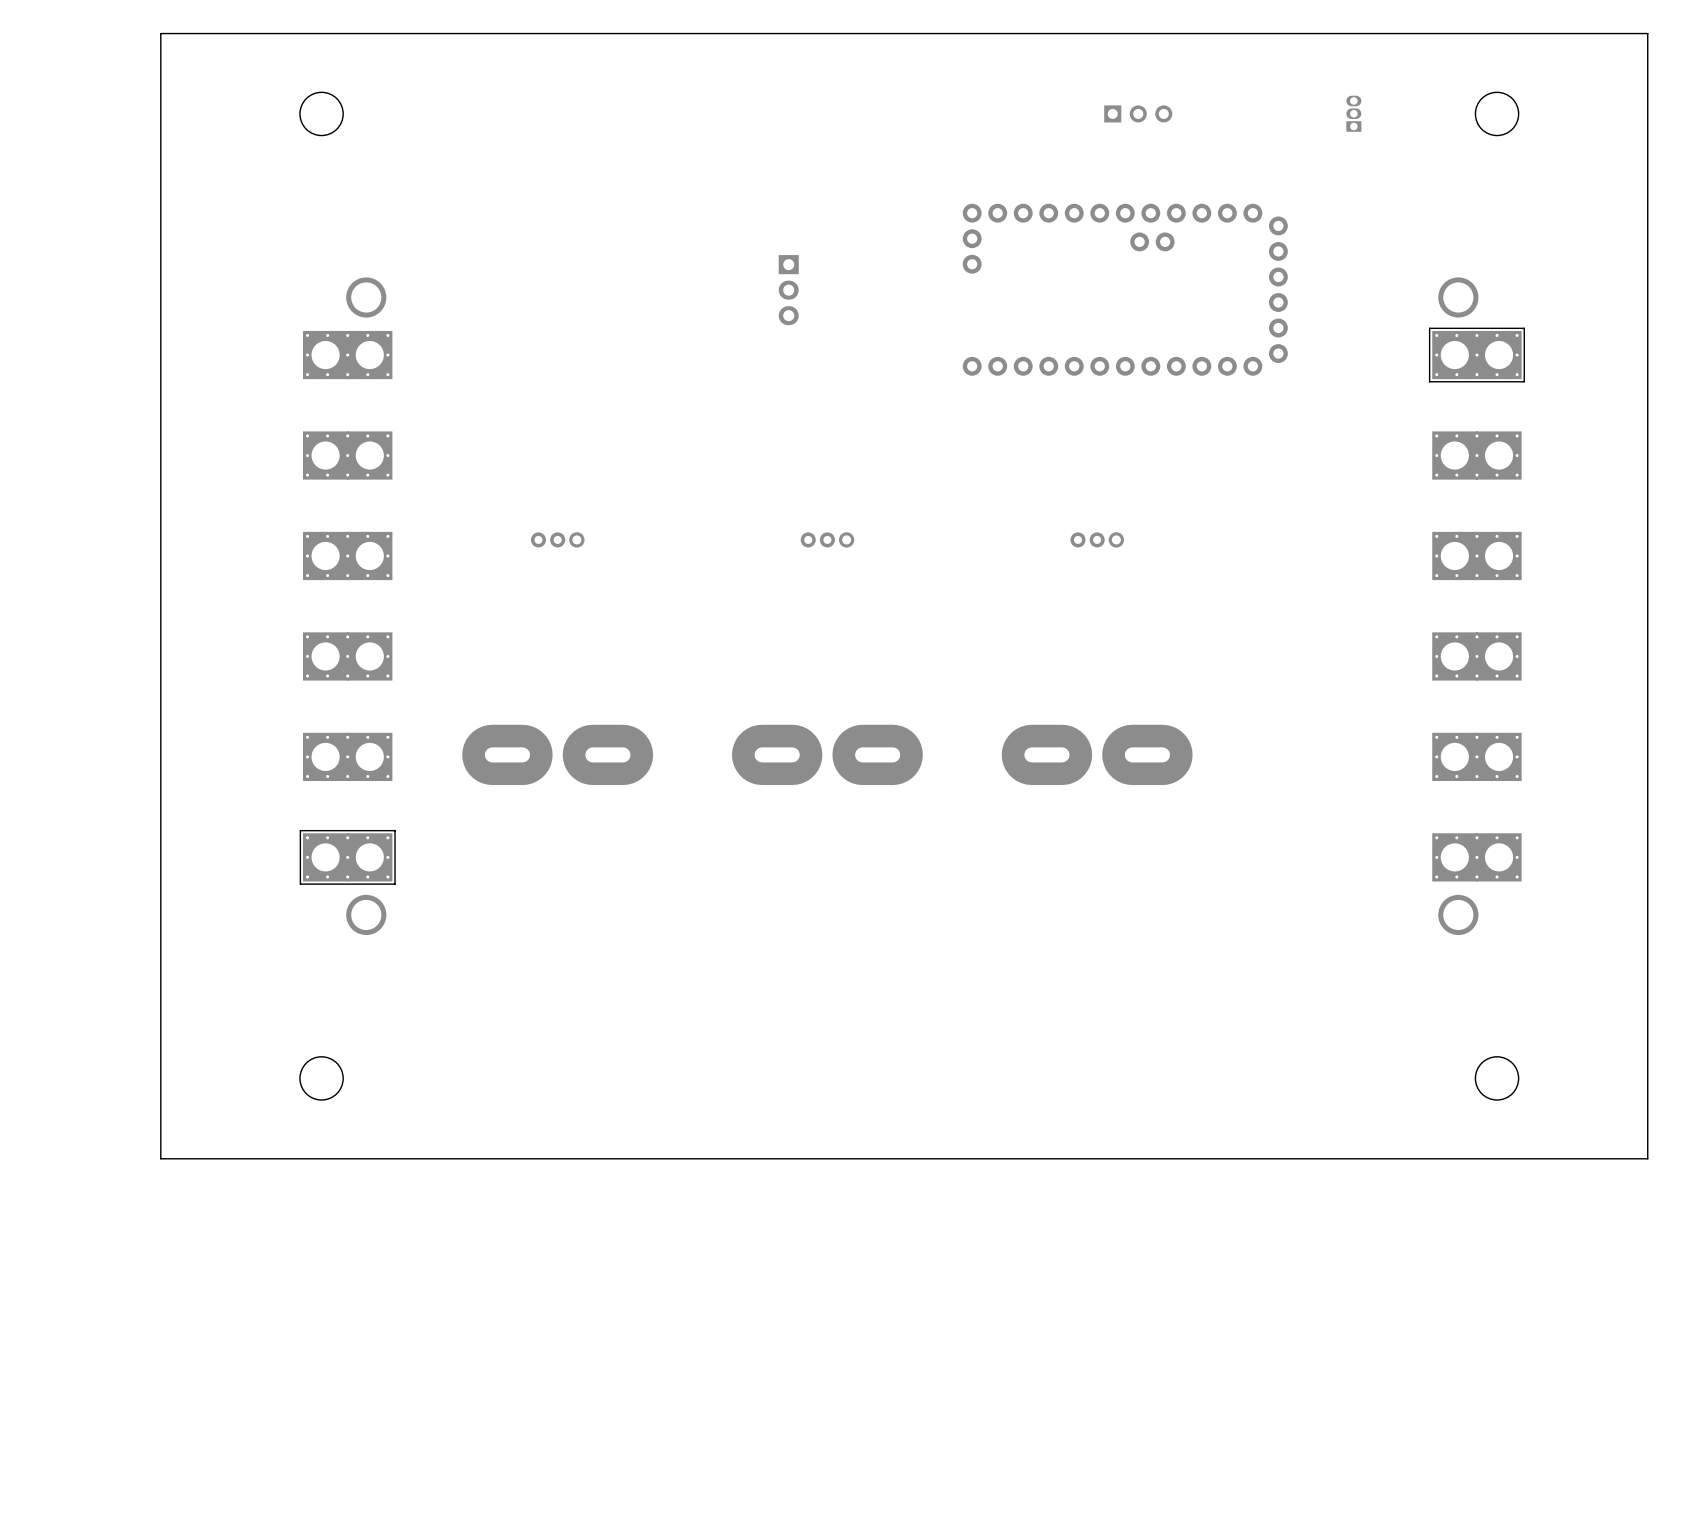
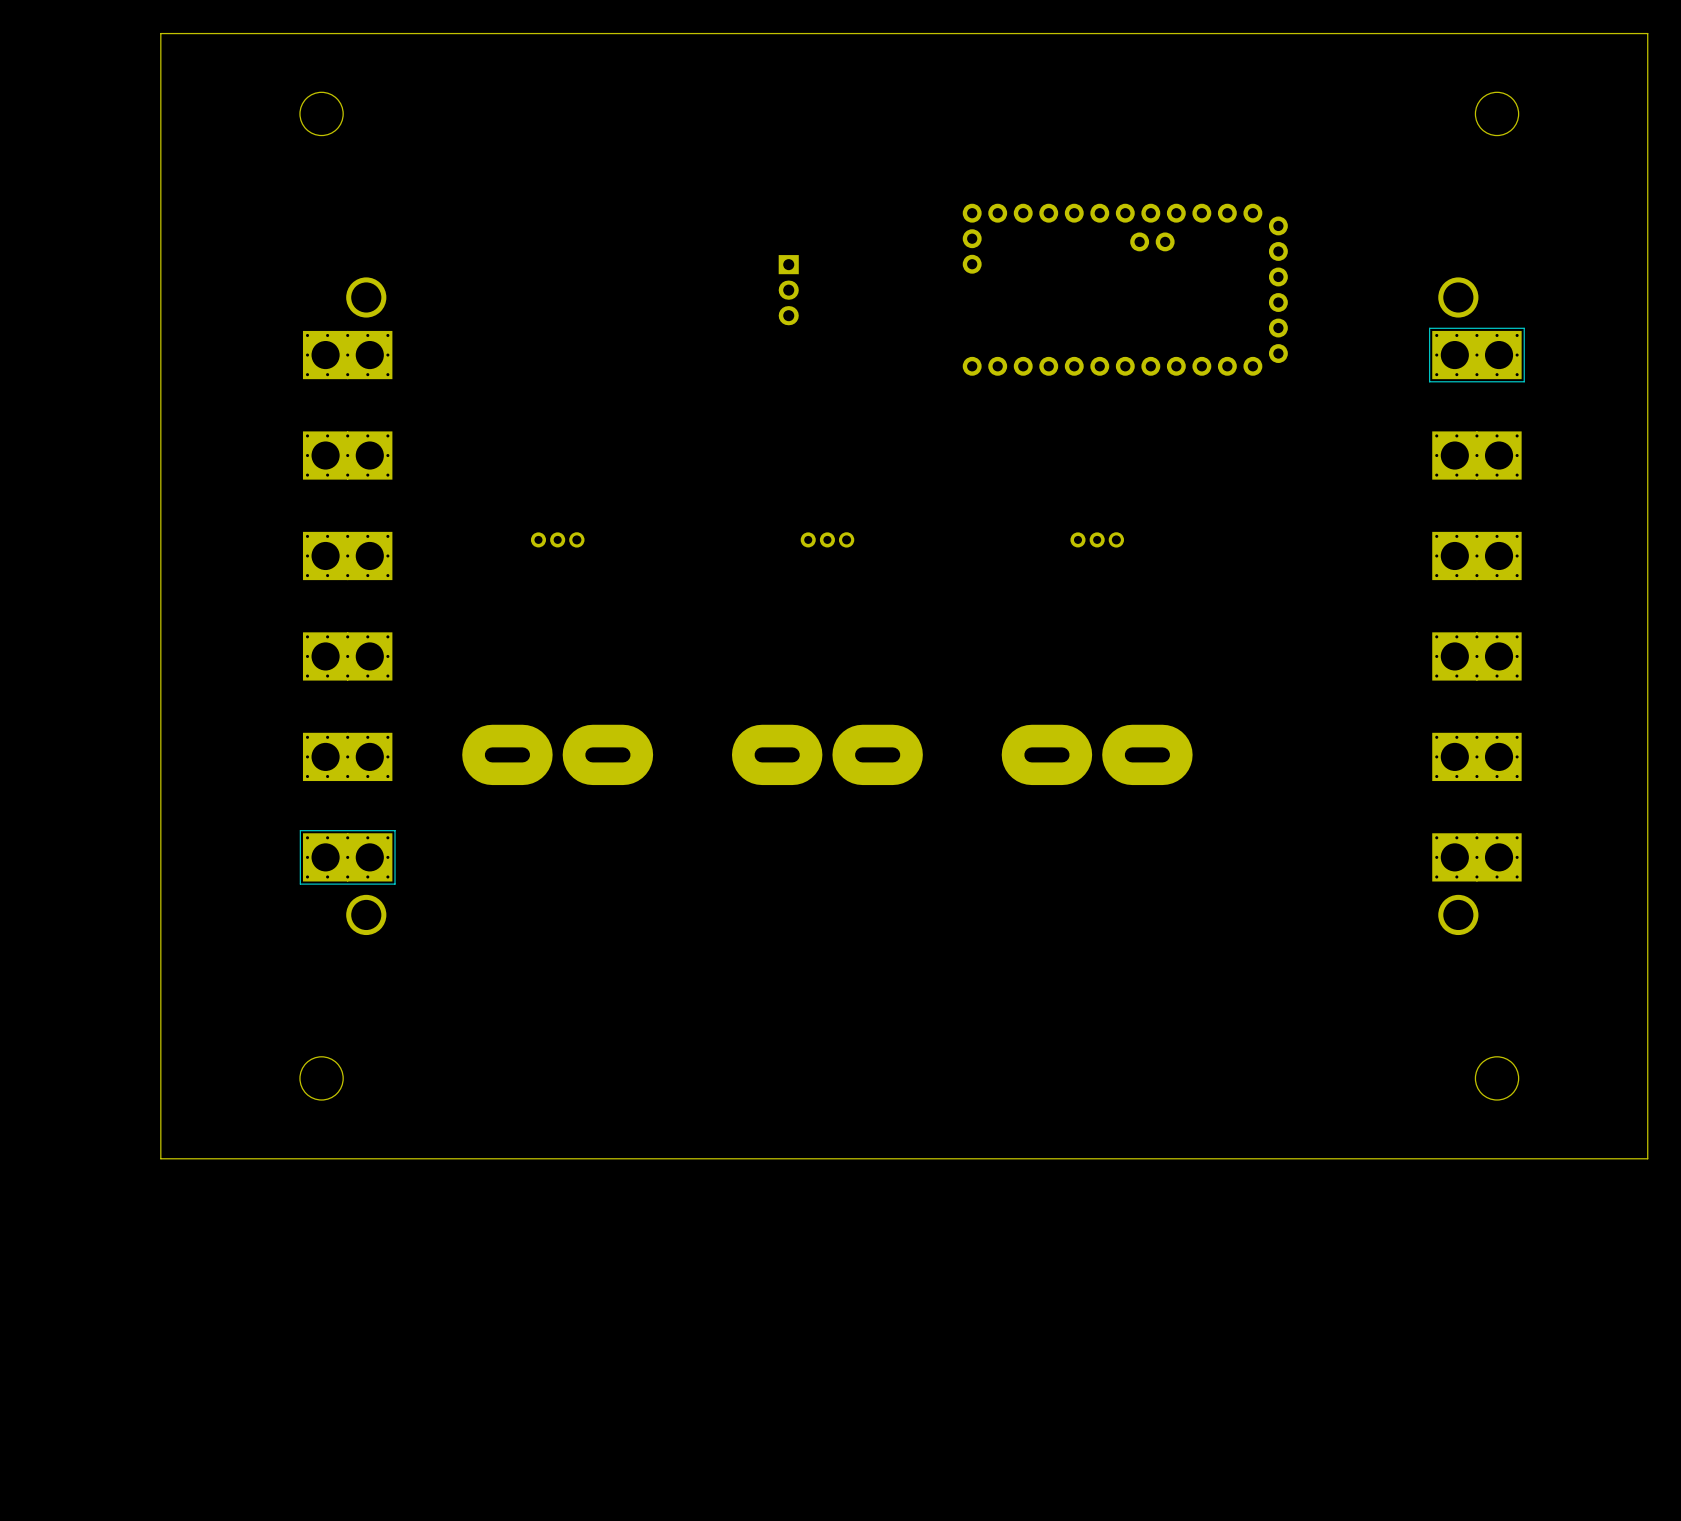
part: (1138, 113) -> none
part: (1353, 113) -> none

